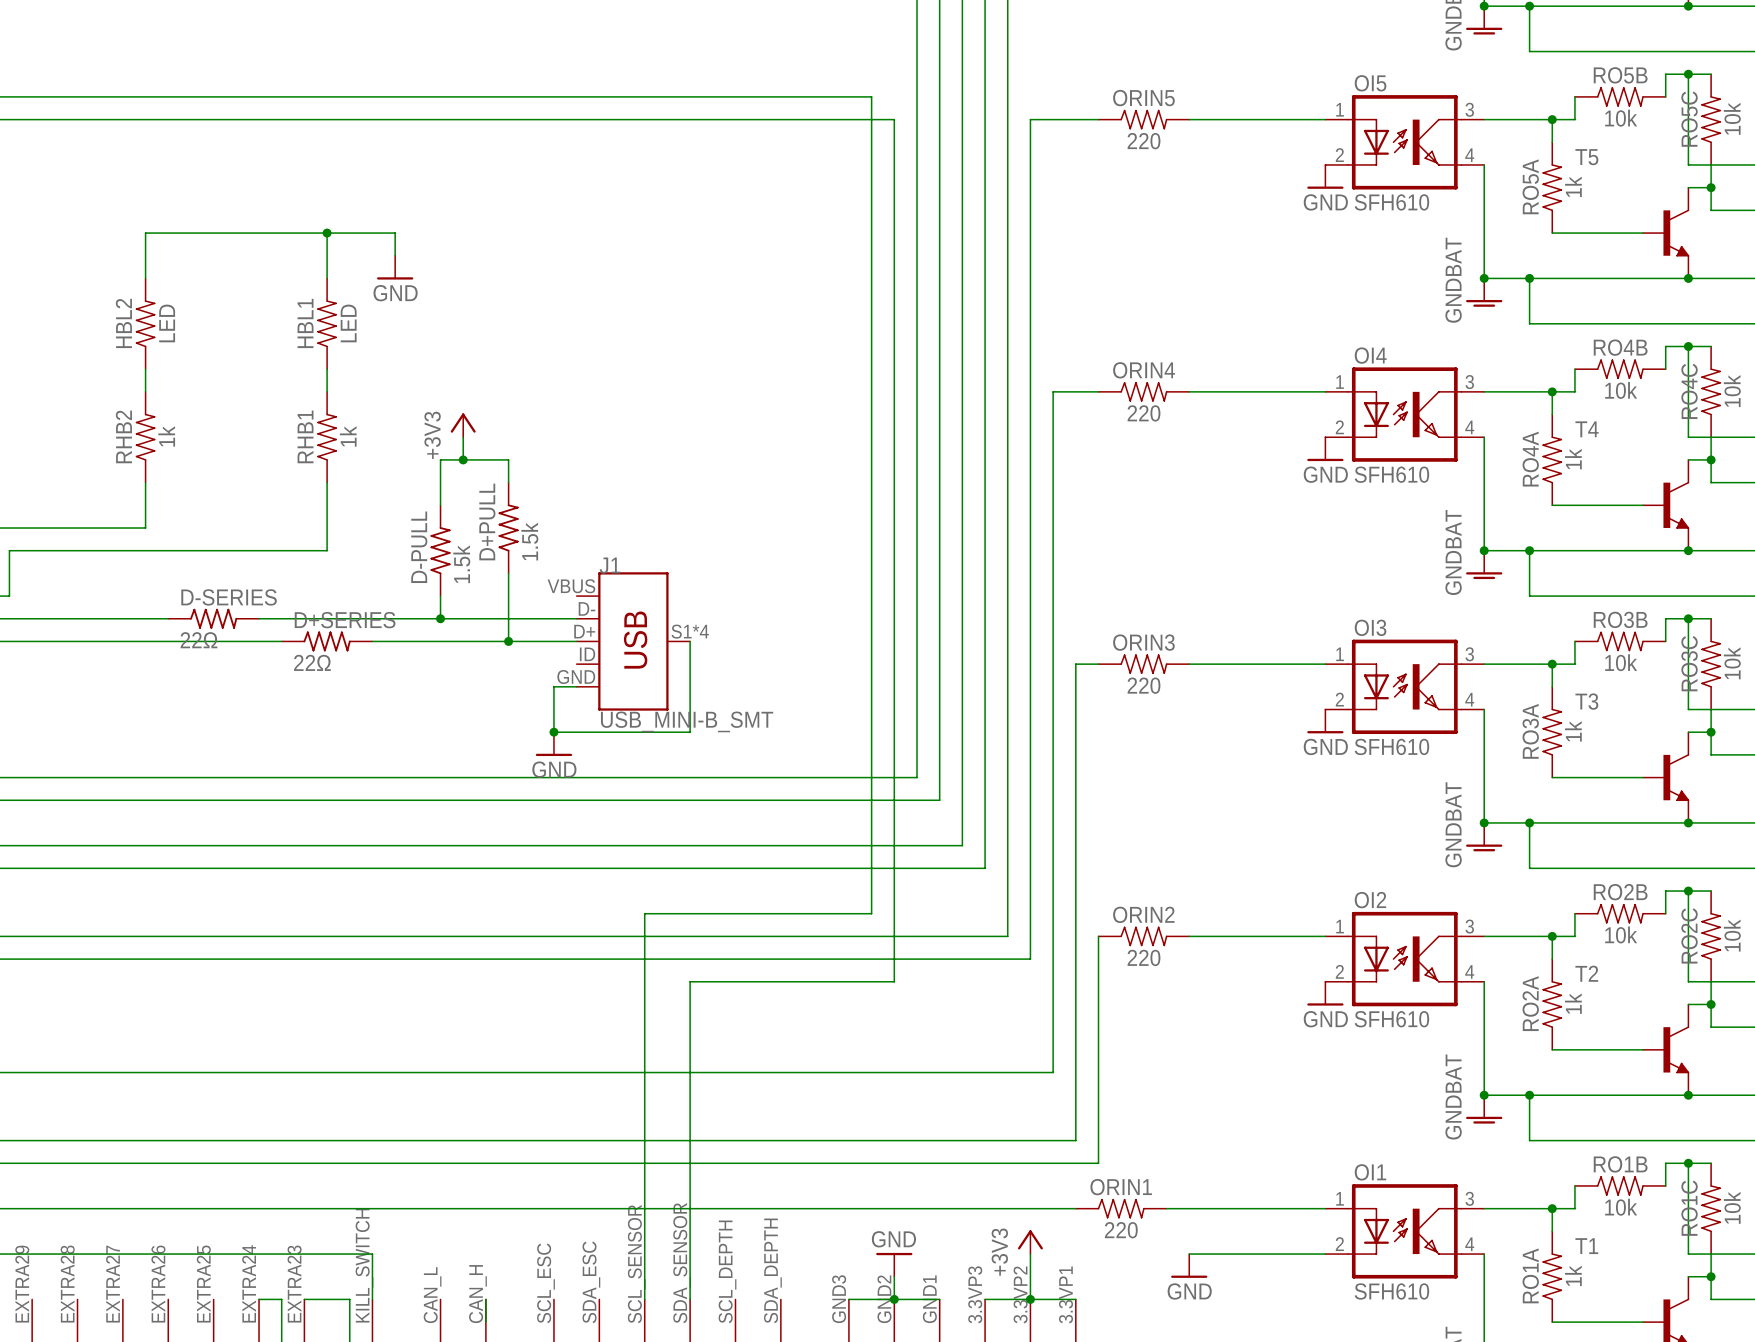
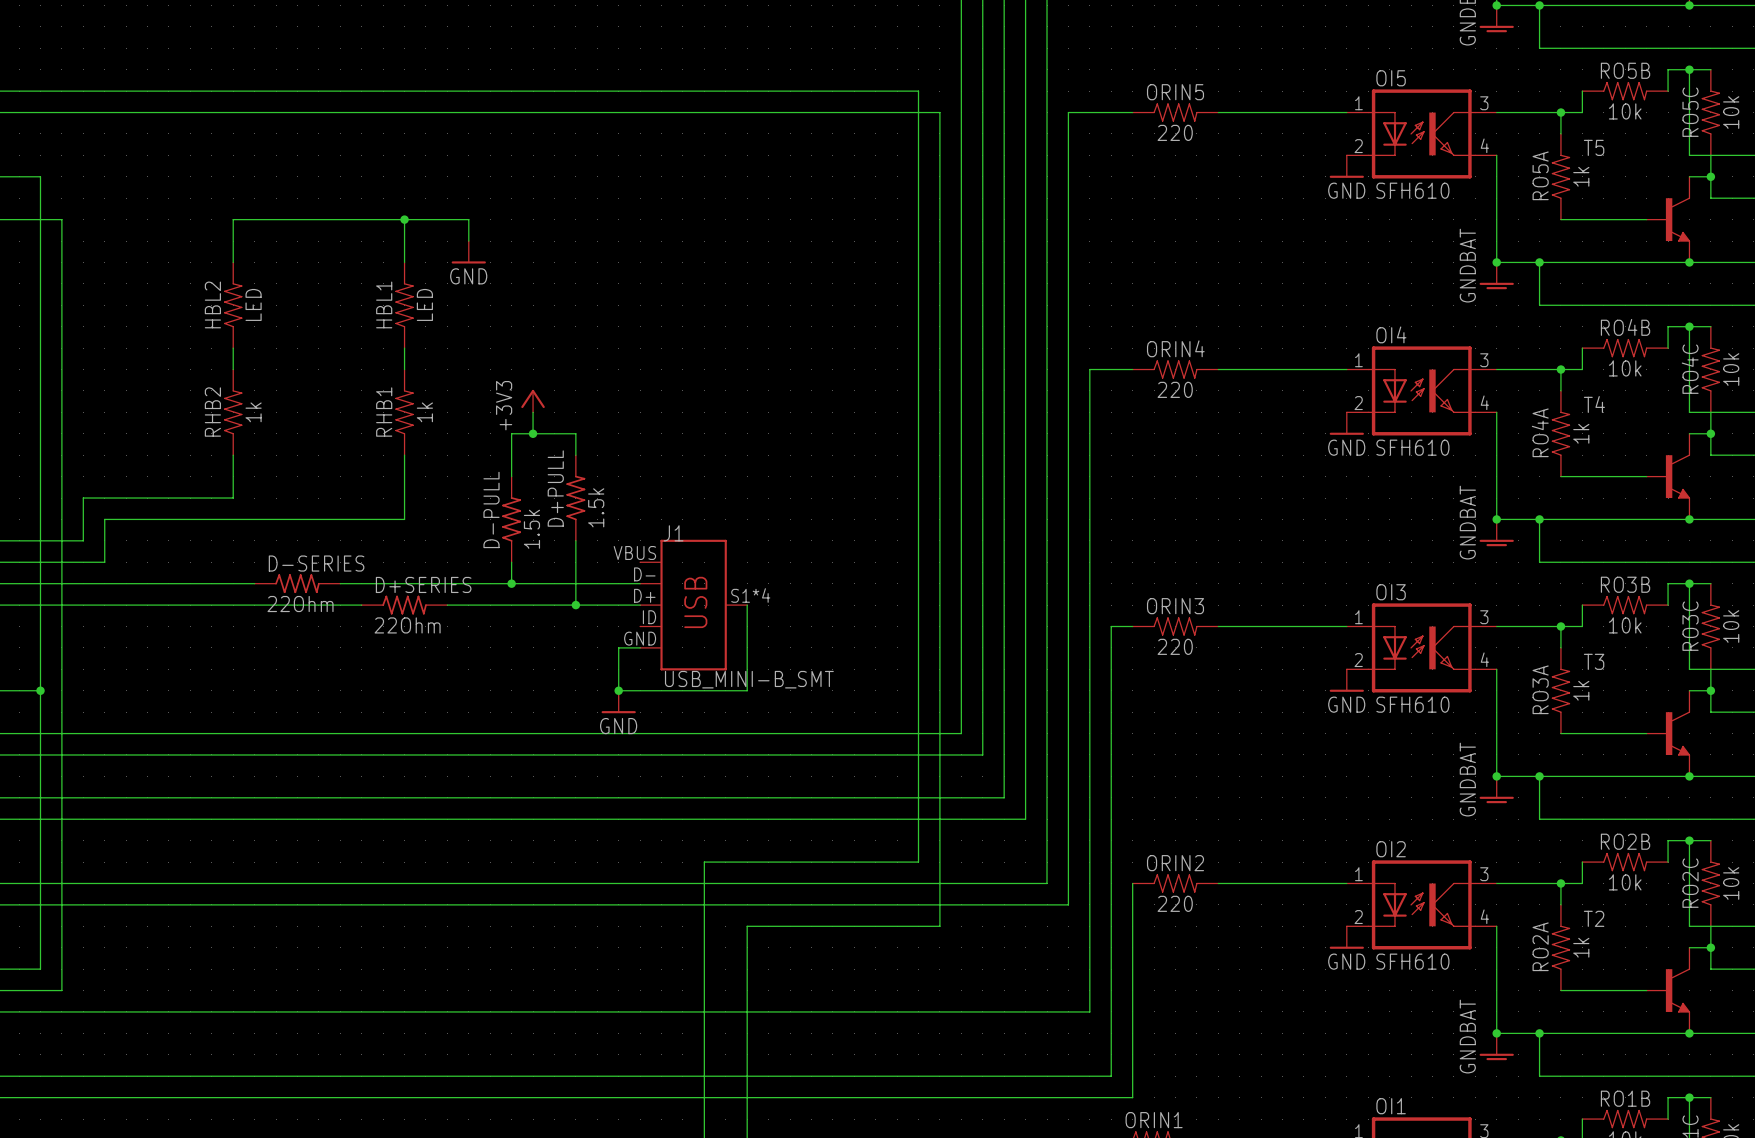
D-SERIES value: 22Ω (199, 640) -> 22Ohm (300, 604)
D+SERIES value: 22Ω (312, 662) -> 22Ohm (407, 625)

